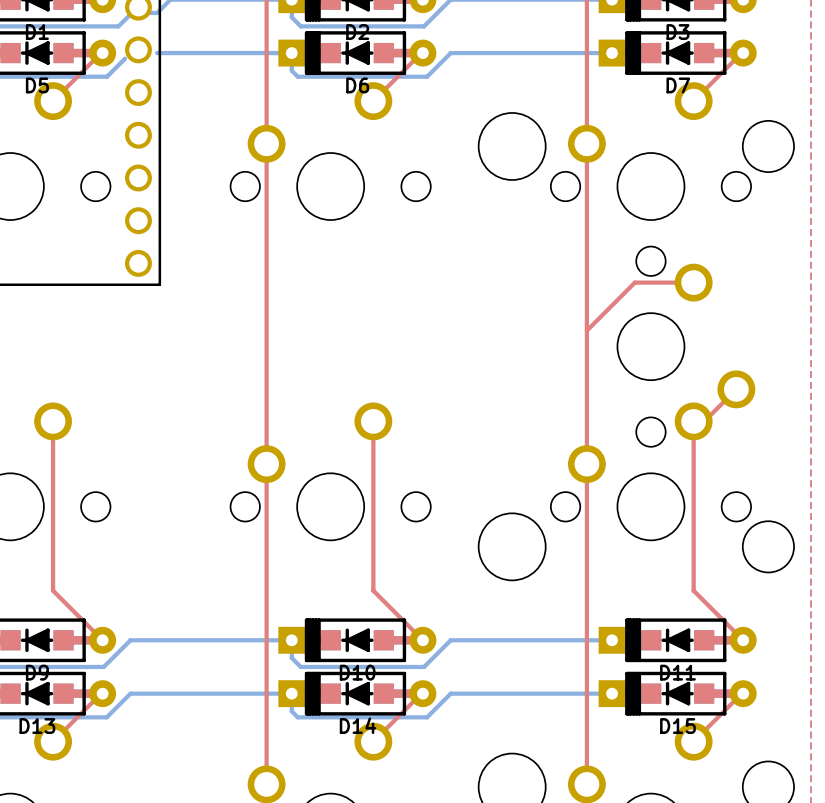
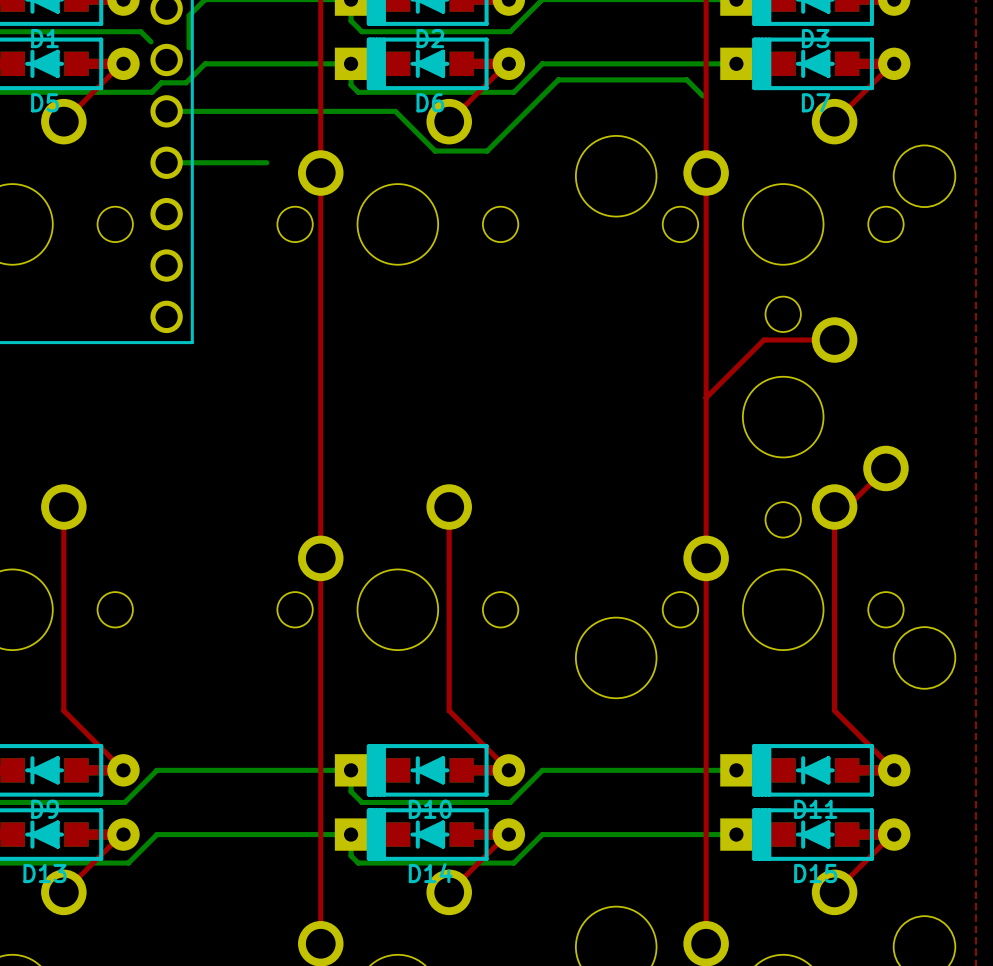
bottom track: (157, 13) (131, 13) (117, 26) -> (151, 41) (140, 31)
bottom track: none -> (189, 15) (189, 47)
bottom track: (157, 53) (170, 53) -> none
bottom track: (125, 58) (107, 76) -> (205, 63) (186, 82) (161, 82) (151, 92) (128, 92)
bottom track: none -> (702, 95) (686, 79) (558, 79) (487, 151) (435, 151) (395, 111) (166, 111)
bottom track: none -> (166, 162) (266, 162)

